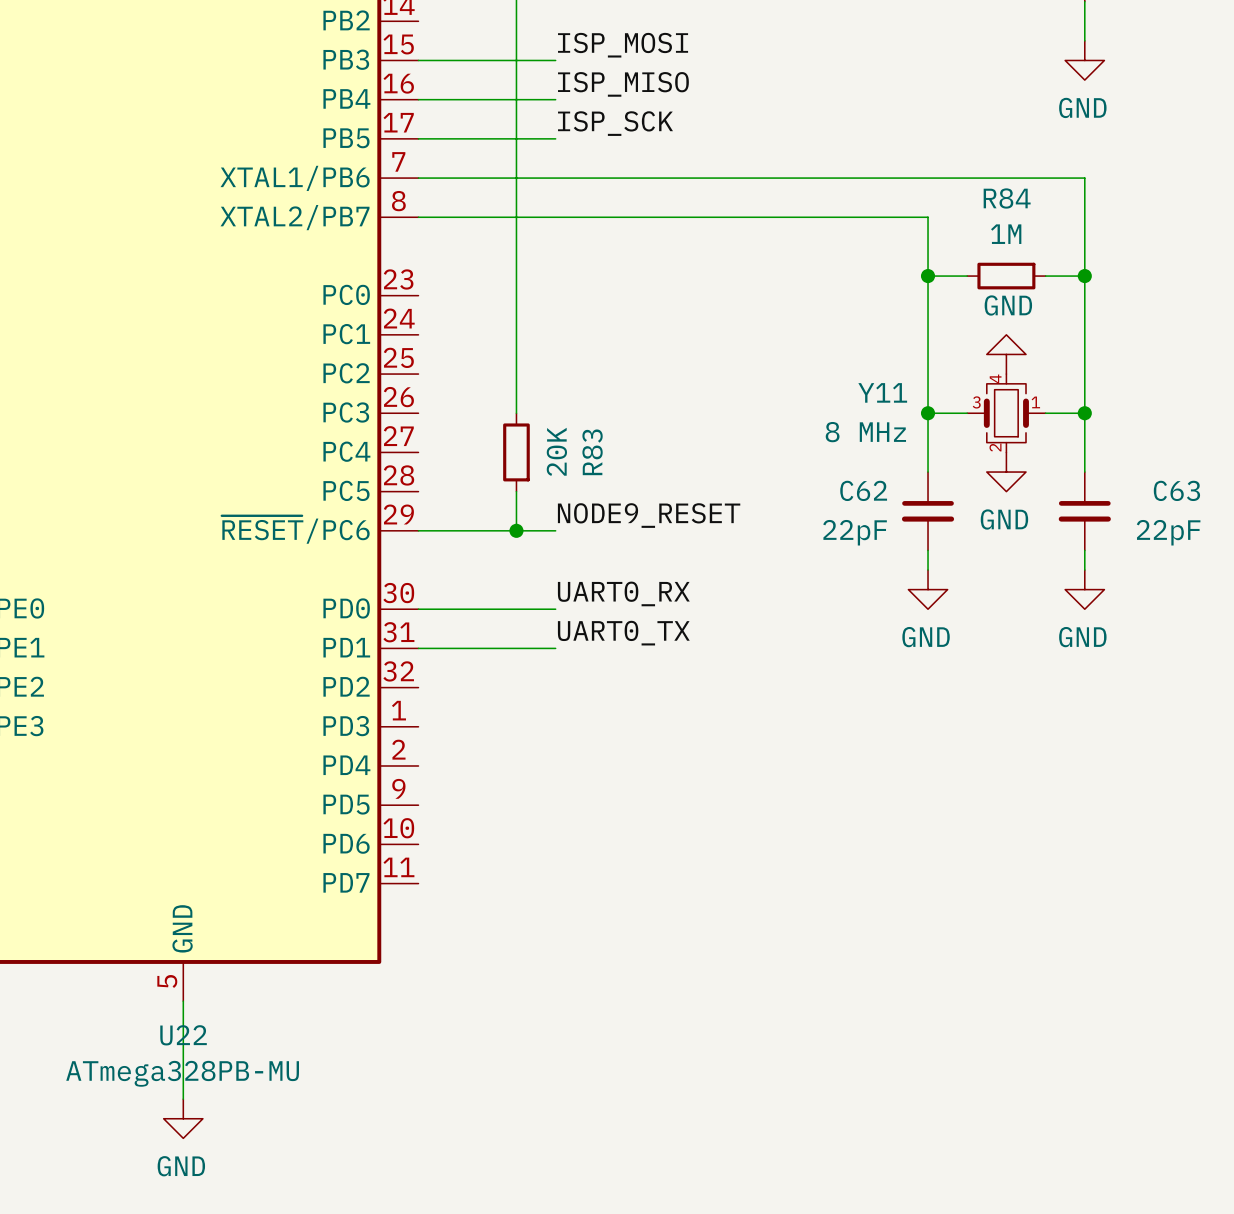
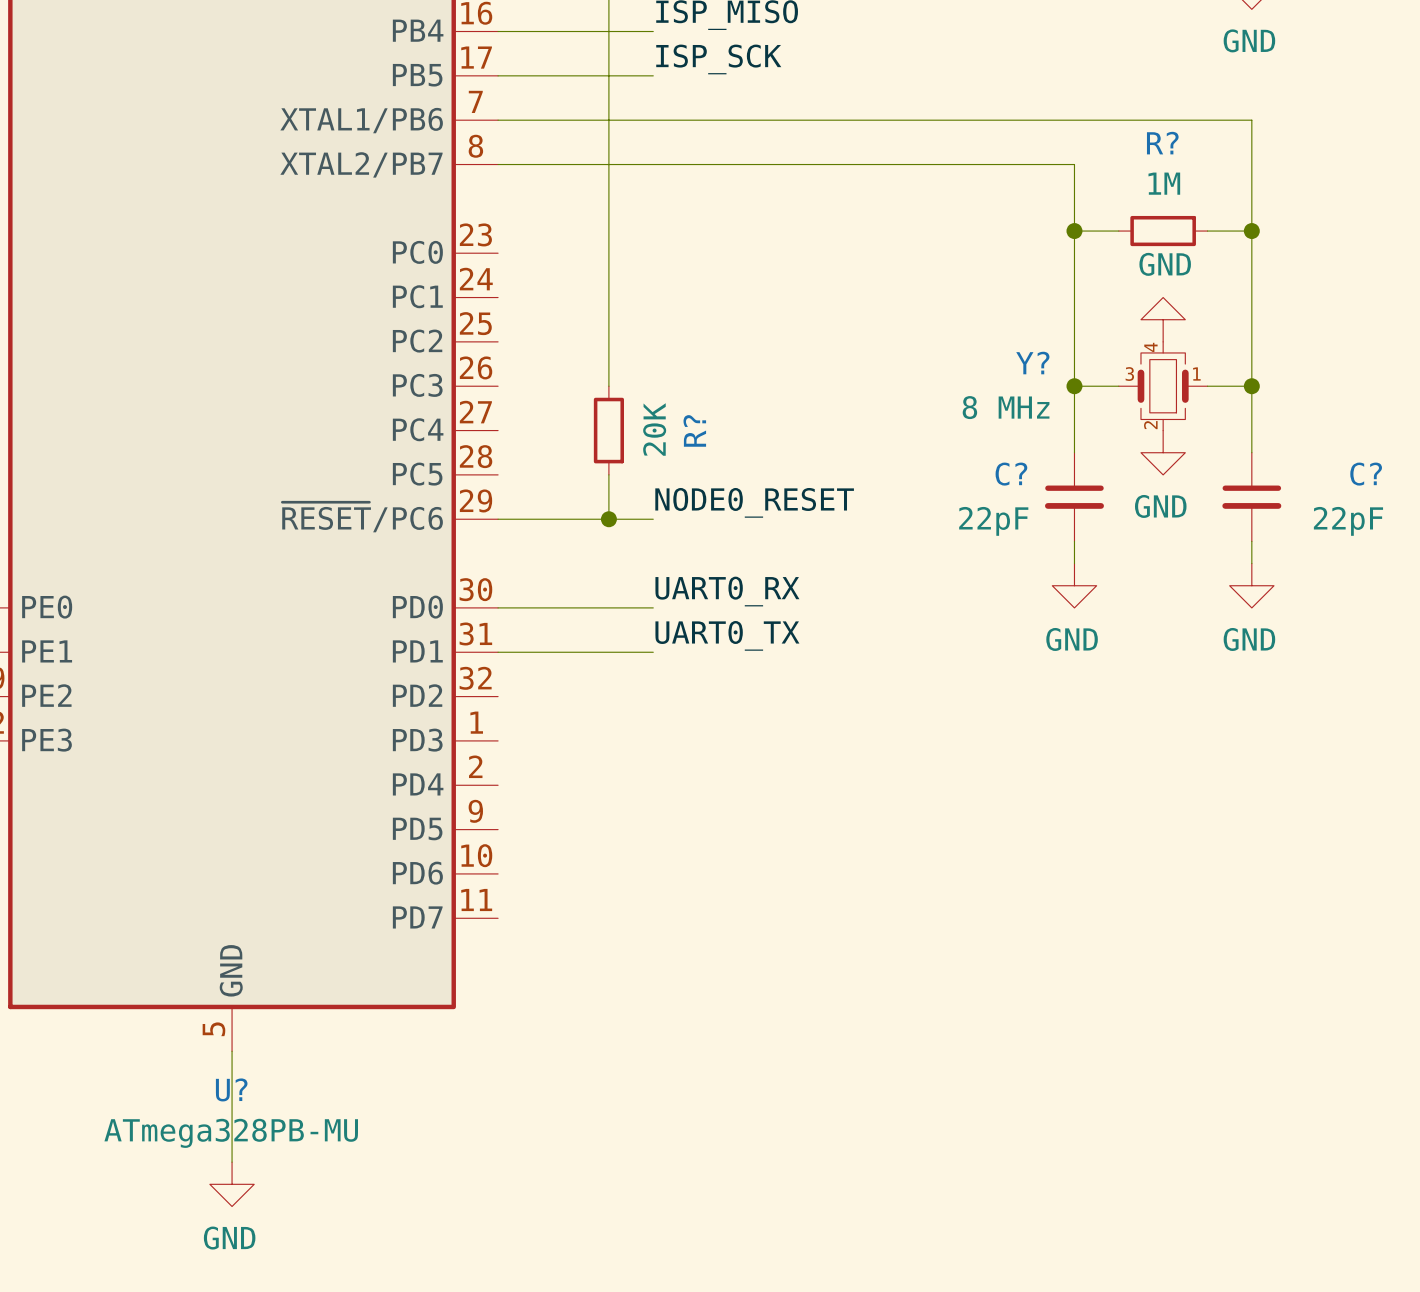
R84 name: R84 (1007, 198) -> R? (1162, 143)
Y11 name: Y11 (882, 392) -> Y? (1032, 363)
R83 name: R83 (592, 452) -> R? (694, 430)
C62 name: C62 (863, 490) -> C? (1011, 474)
C63 name: C63 (1176, 490) -> C? (1366, 474)
label: NODE9_RESET (649, 515) -> NODE0_RESET (754, 502)
U22 name: U22 (183, 1035) -> U? (231, 1089)

